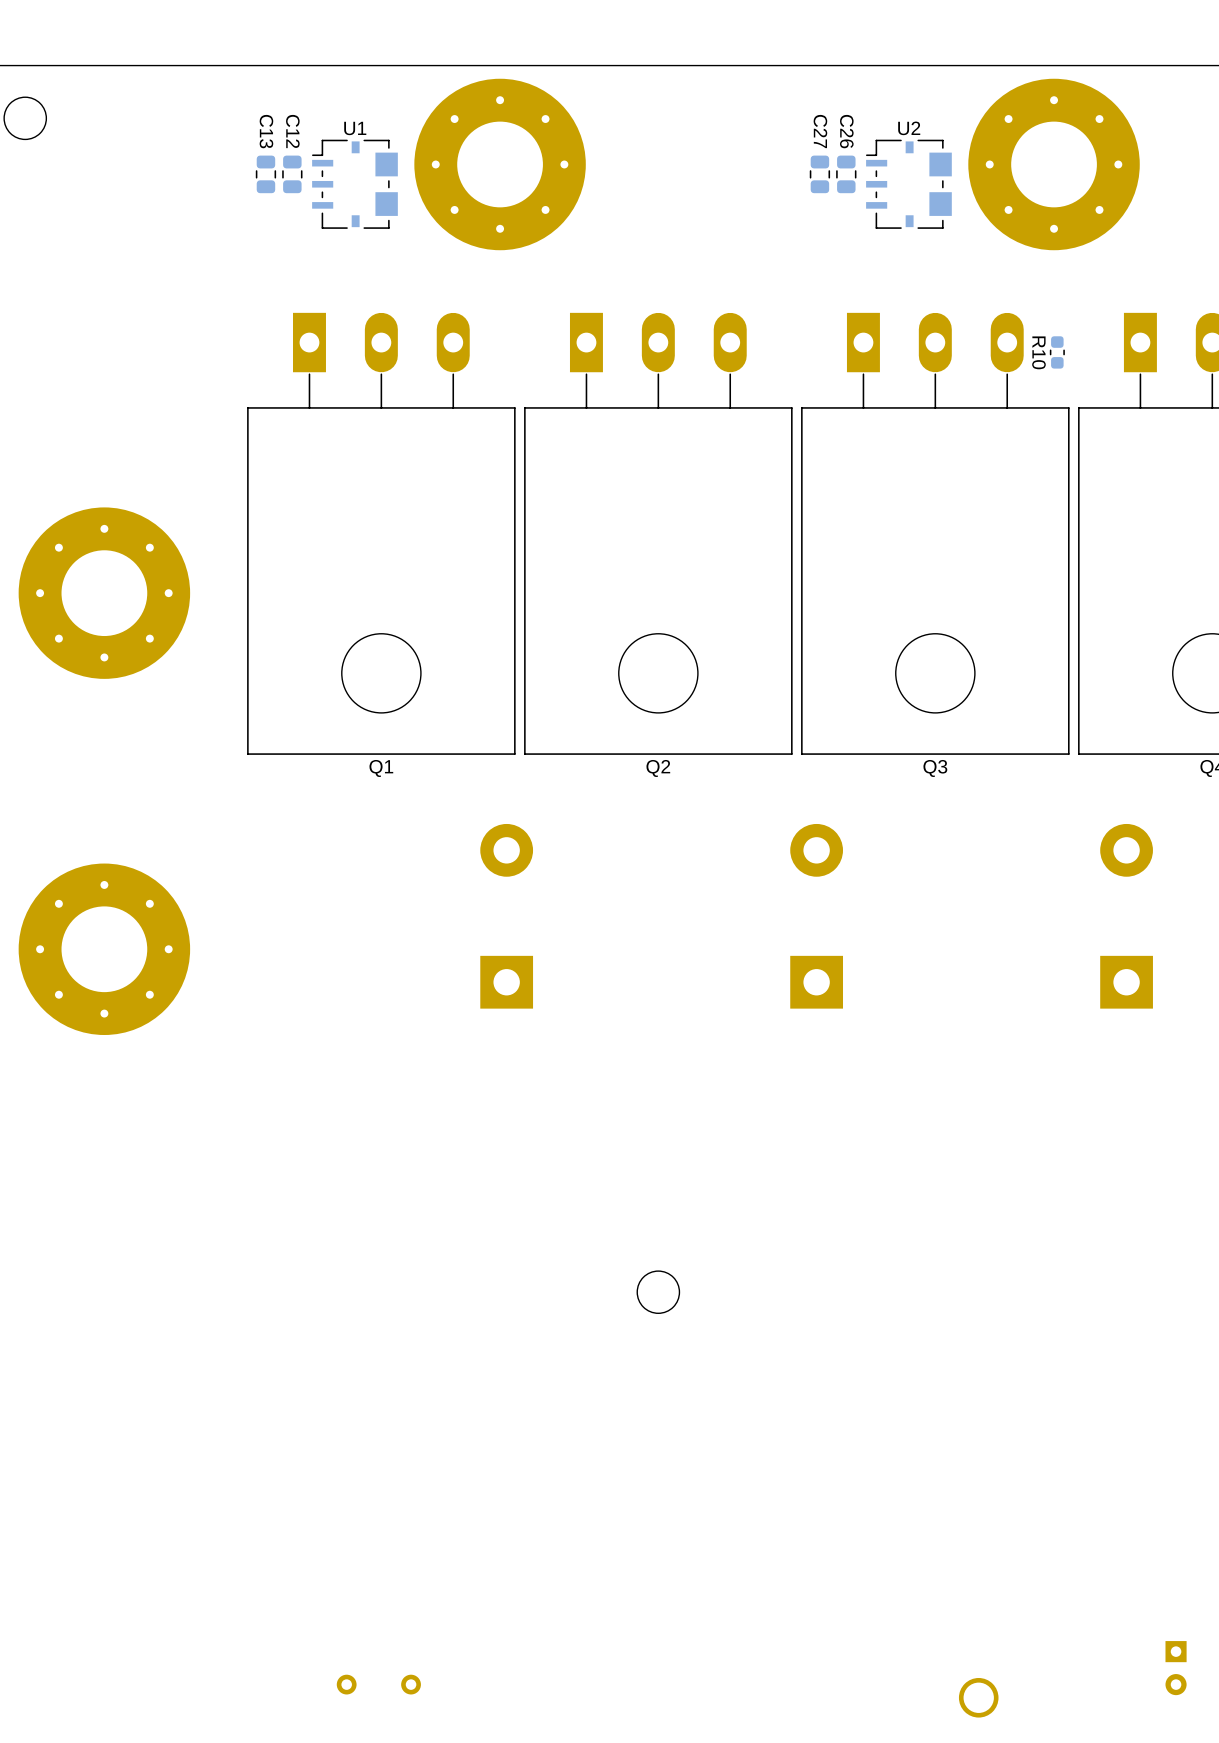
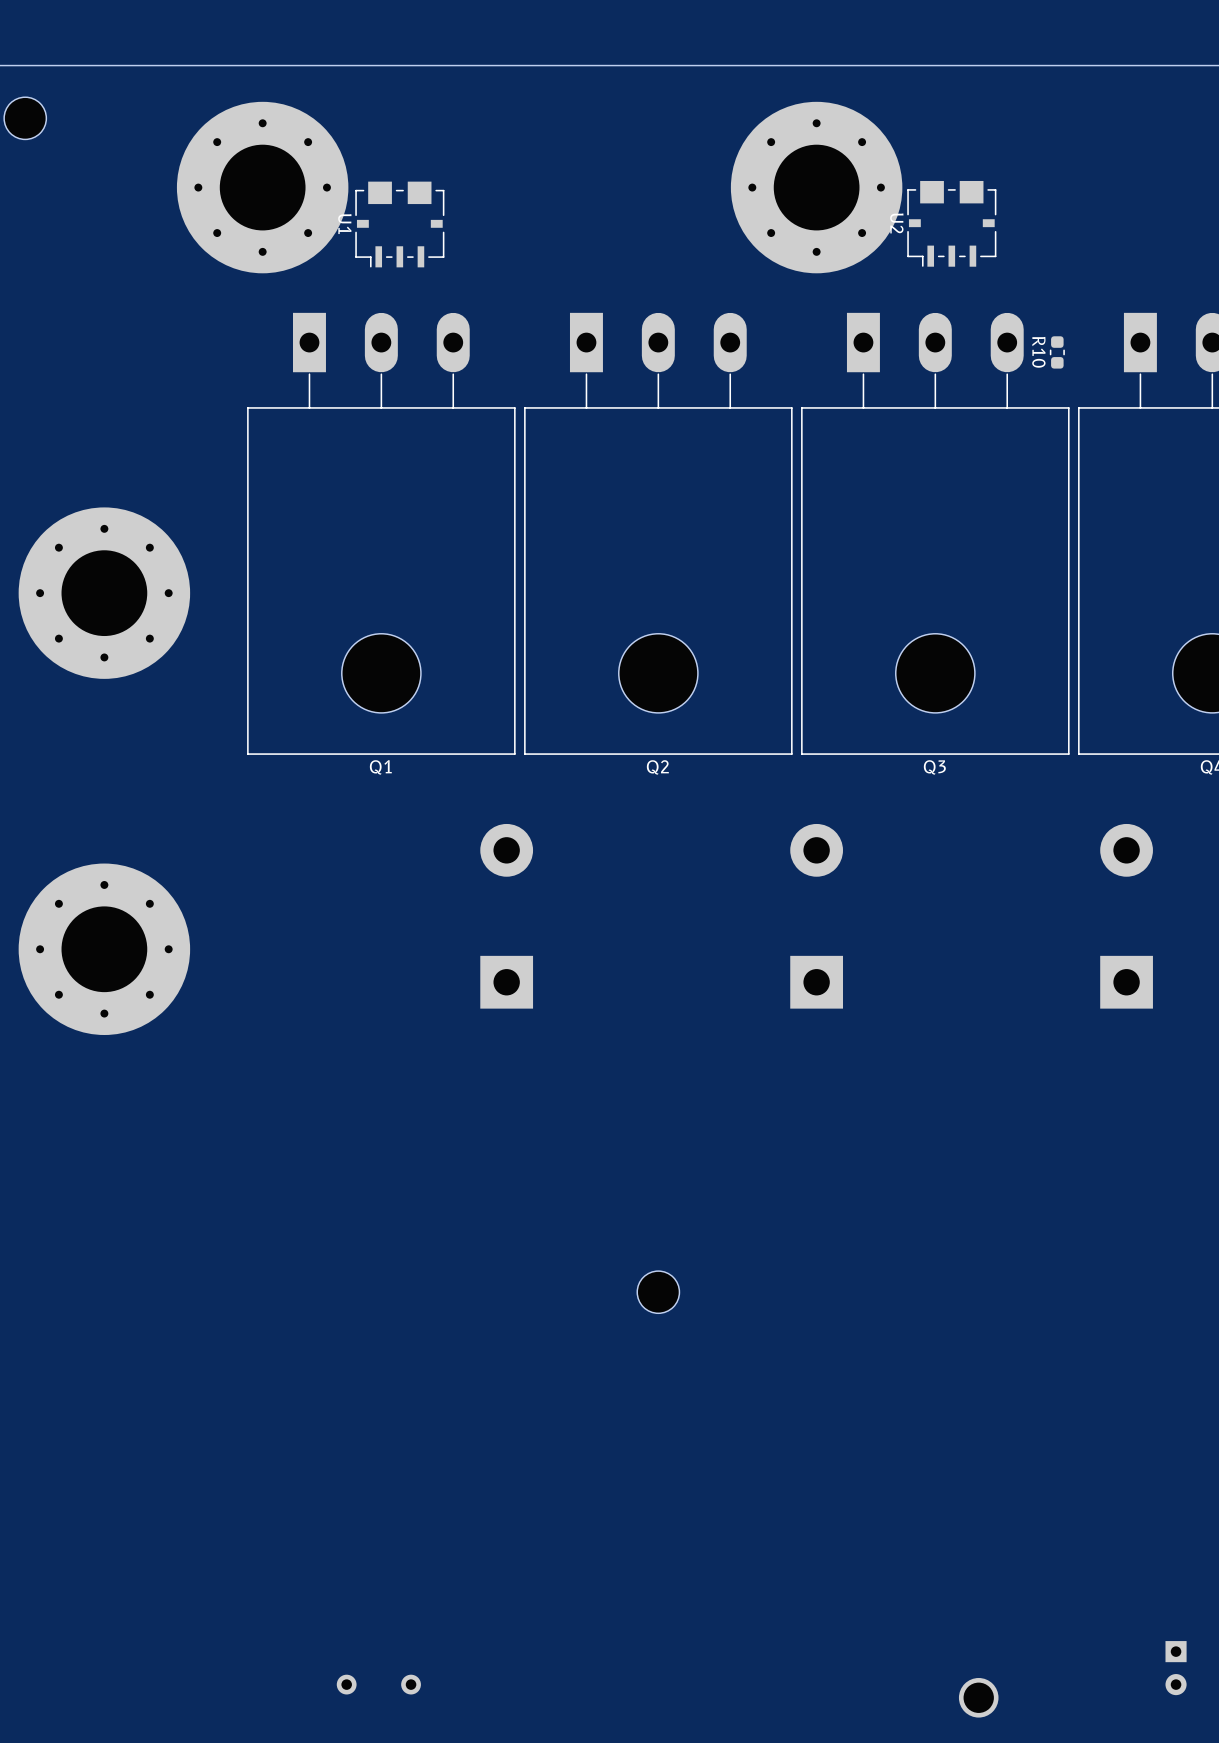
part: (500, 164) -> none
part: (1054, 164) -> none
C13: (265, 174) -> none
C12: (292, 174) -> none
C27: (819, 174) -> none
C26: (846, 174) -> none
U1 rotation: 0° (354, 184) -> 90° counterclockwise (399, 224)
U1 position: (354, 184) -> (399, 224)
U2 rotation: 0° (908, 184) -> 90° counterclockwise (951, 223)
U2 position: (908, 184) -> (951, 223)
part: none -> (262, 187)
part: none -> (816, 187)

